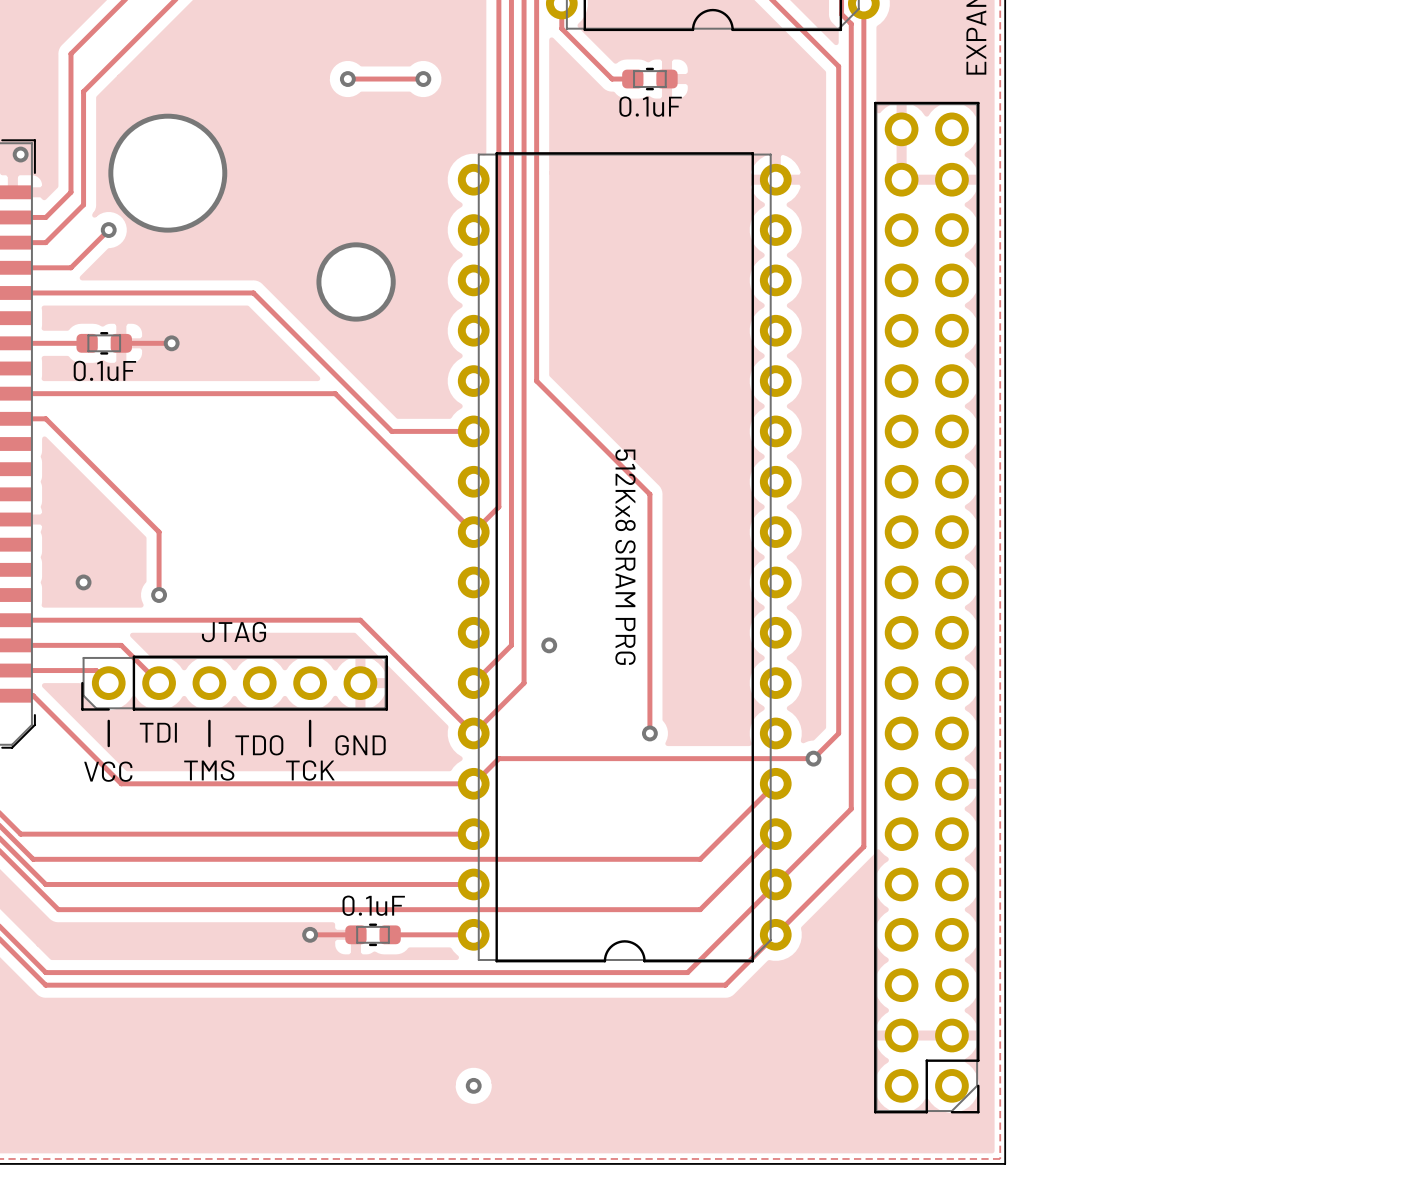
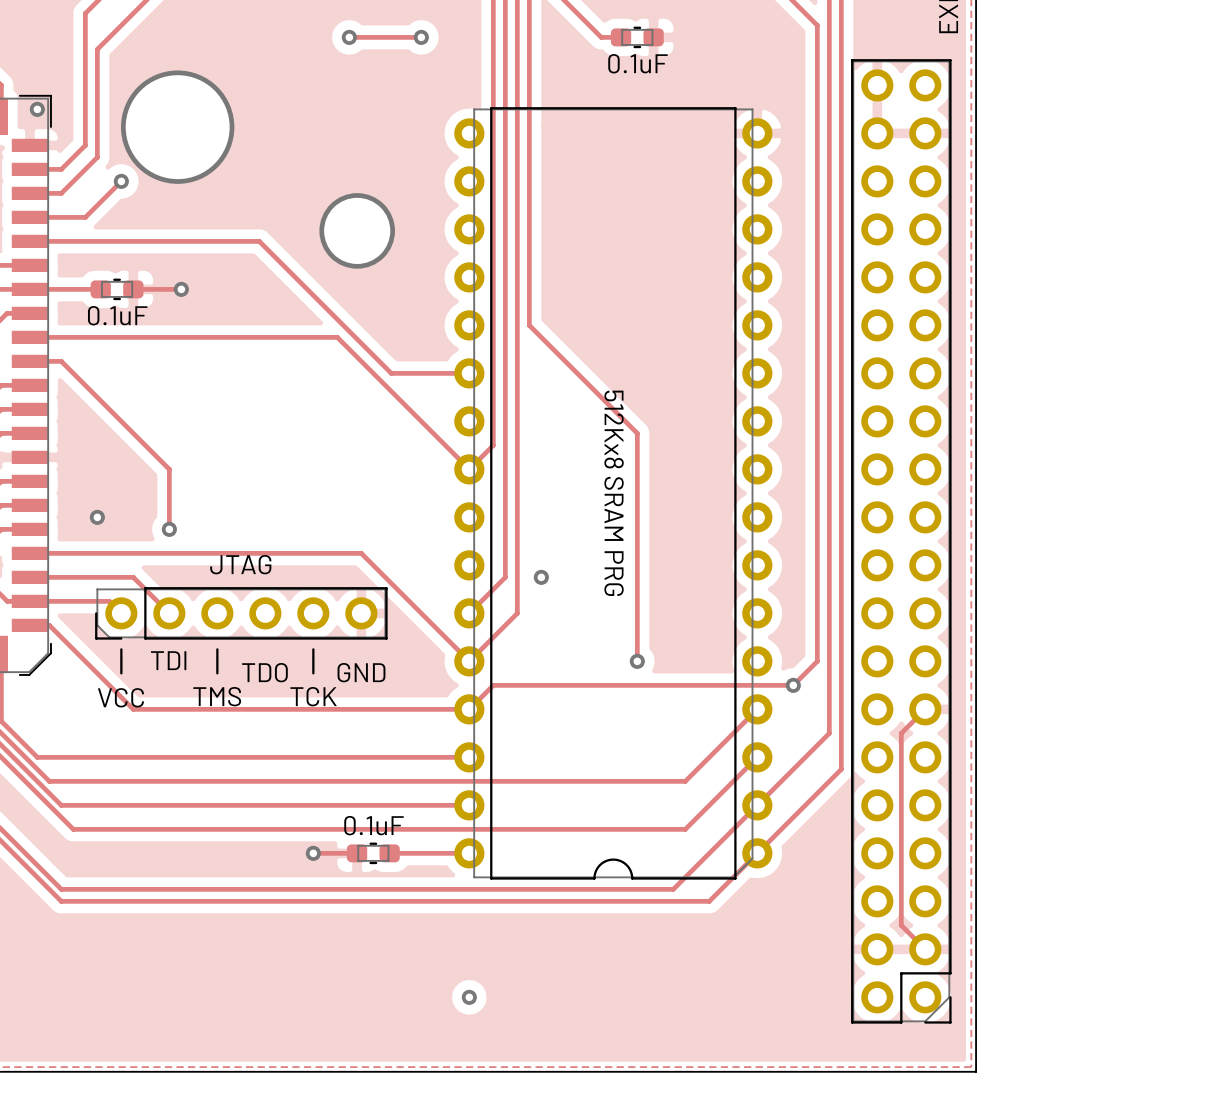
track: none -> (925, 709) (901, 733) (901, 925) (925, 949)

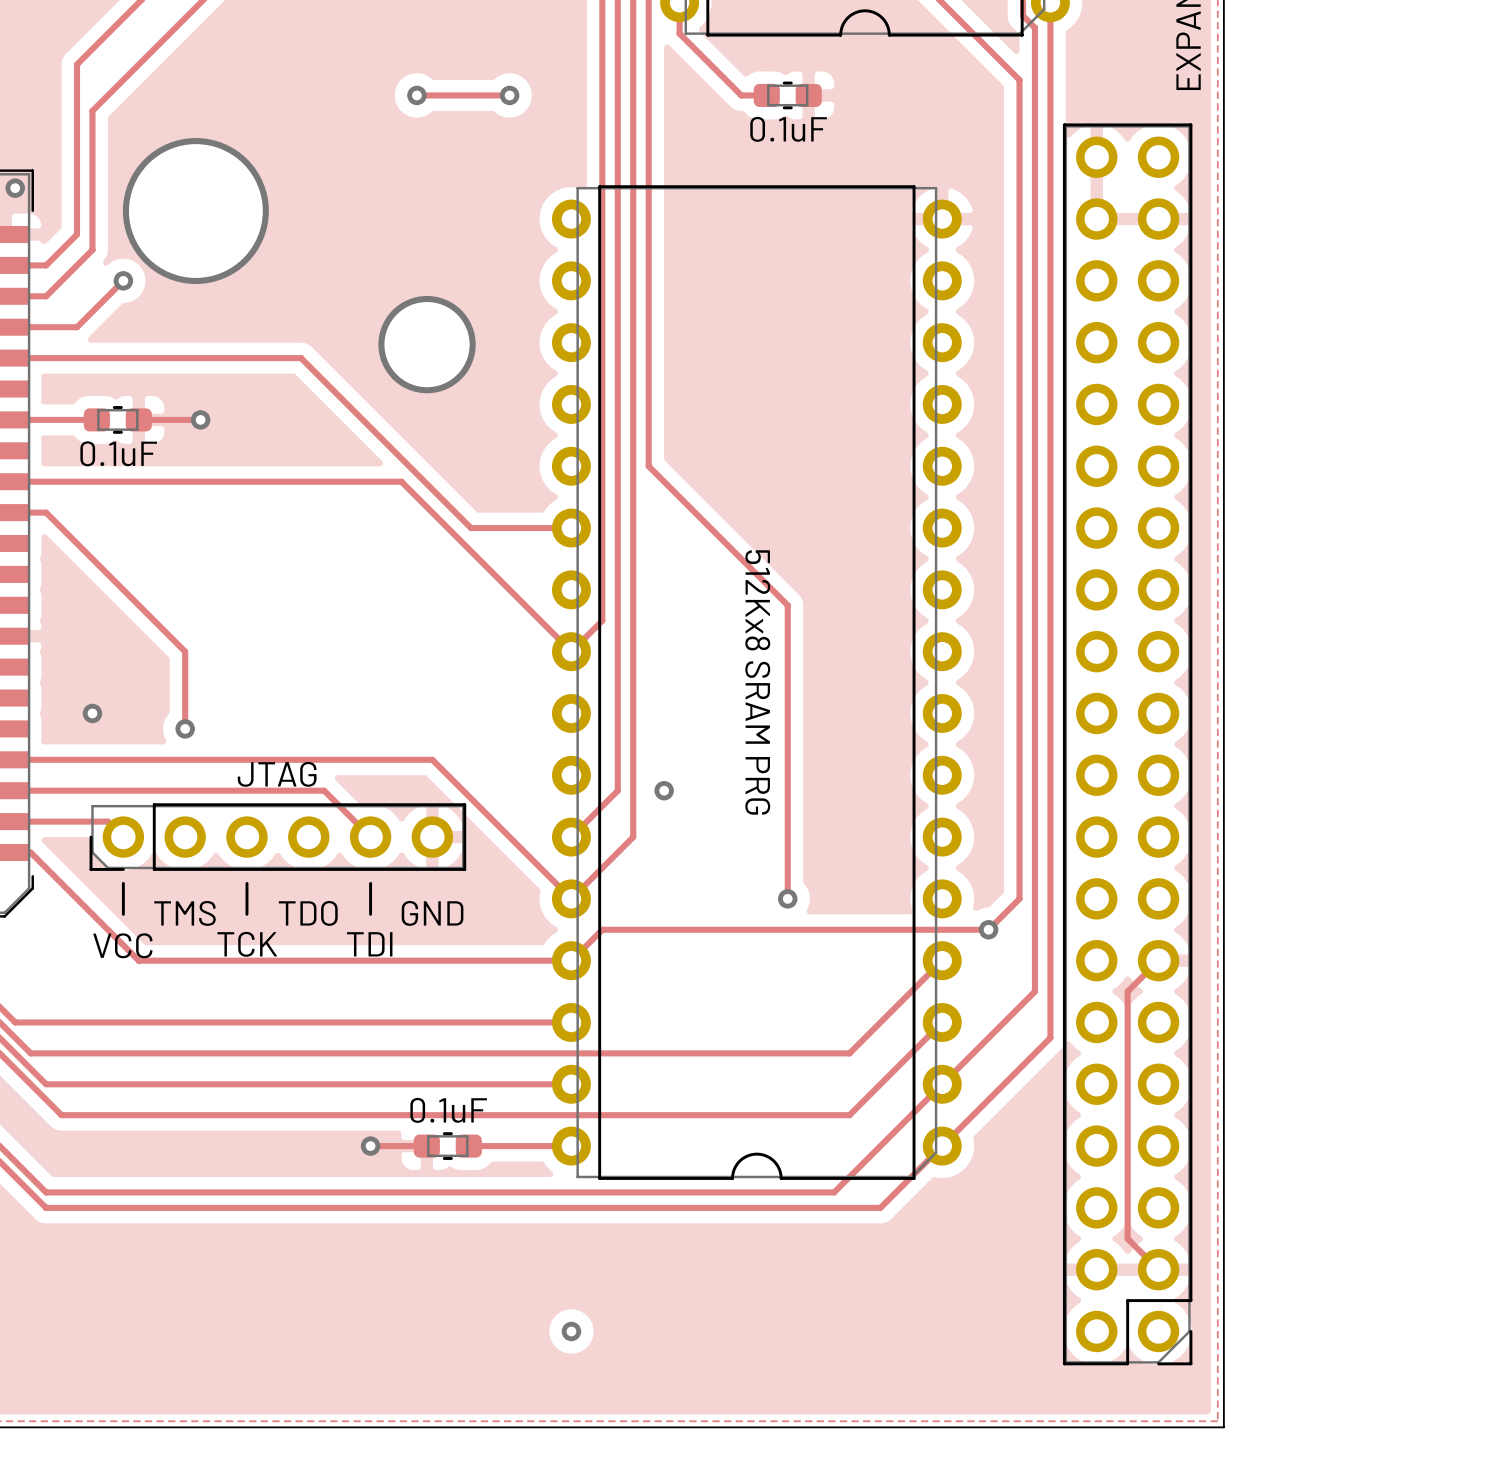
track: (133, 577) (169, 613) -> (138, 790) (324, 790) (370, 837)
text: TDI (168, 660) -> TMS (184, 913)
text: TMS (217, 696) -> TCK (247, 944)
text: TCK (313, 696) -> TDI (369, 944)

